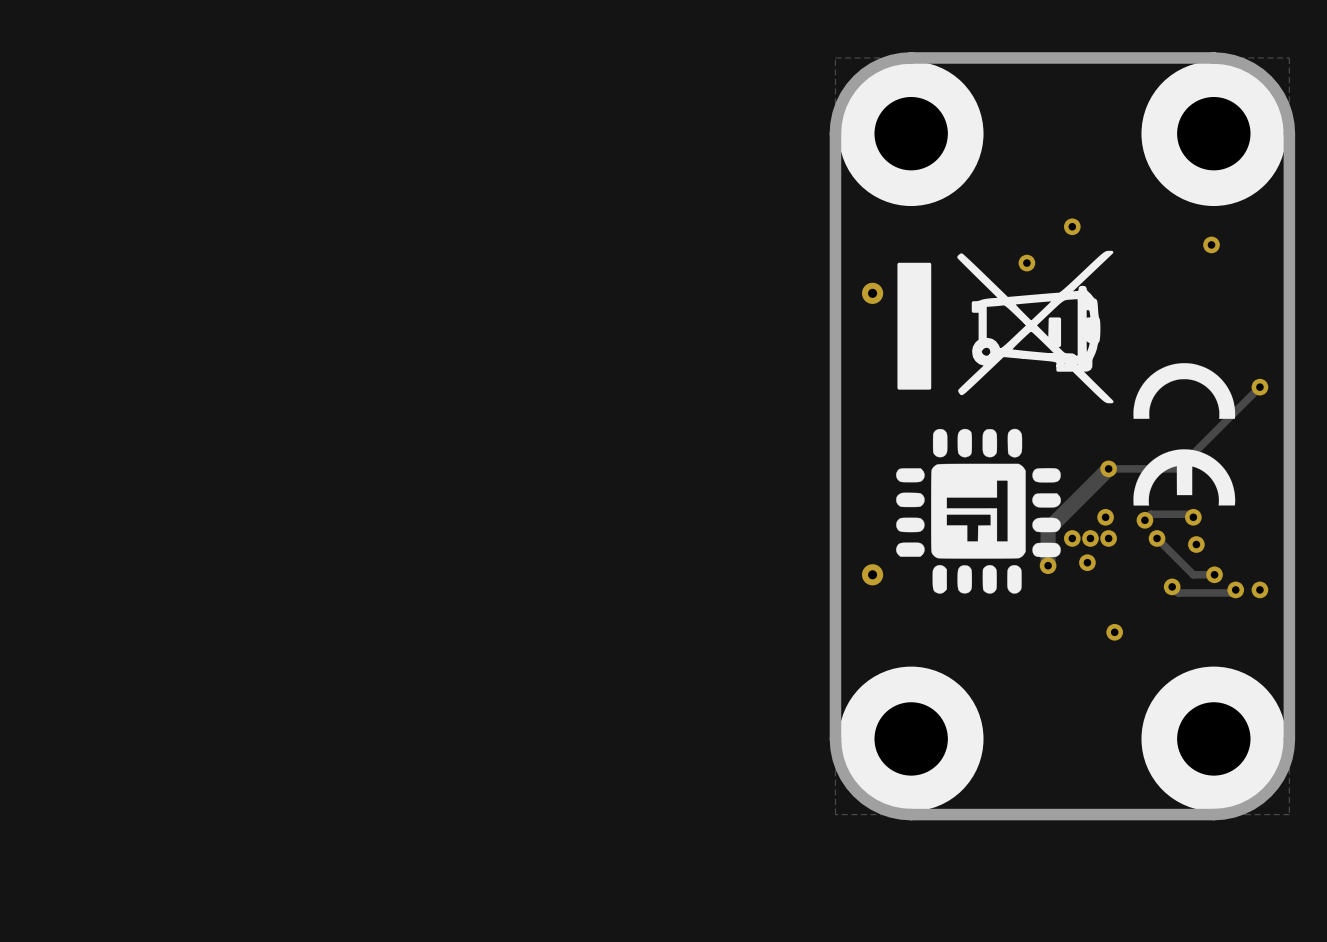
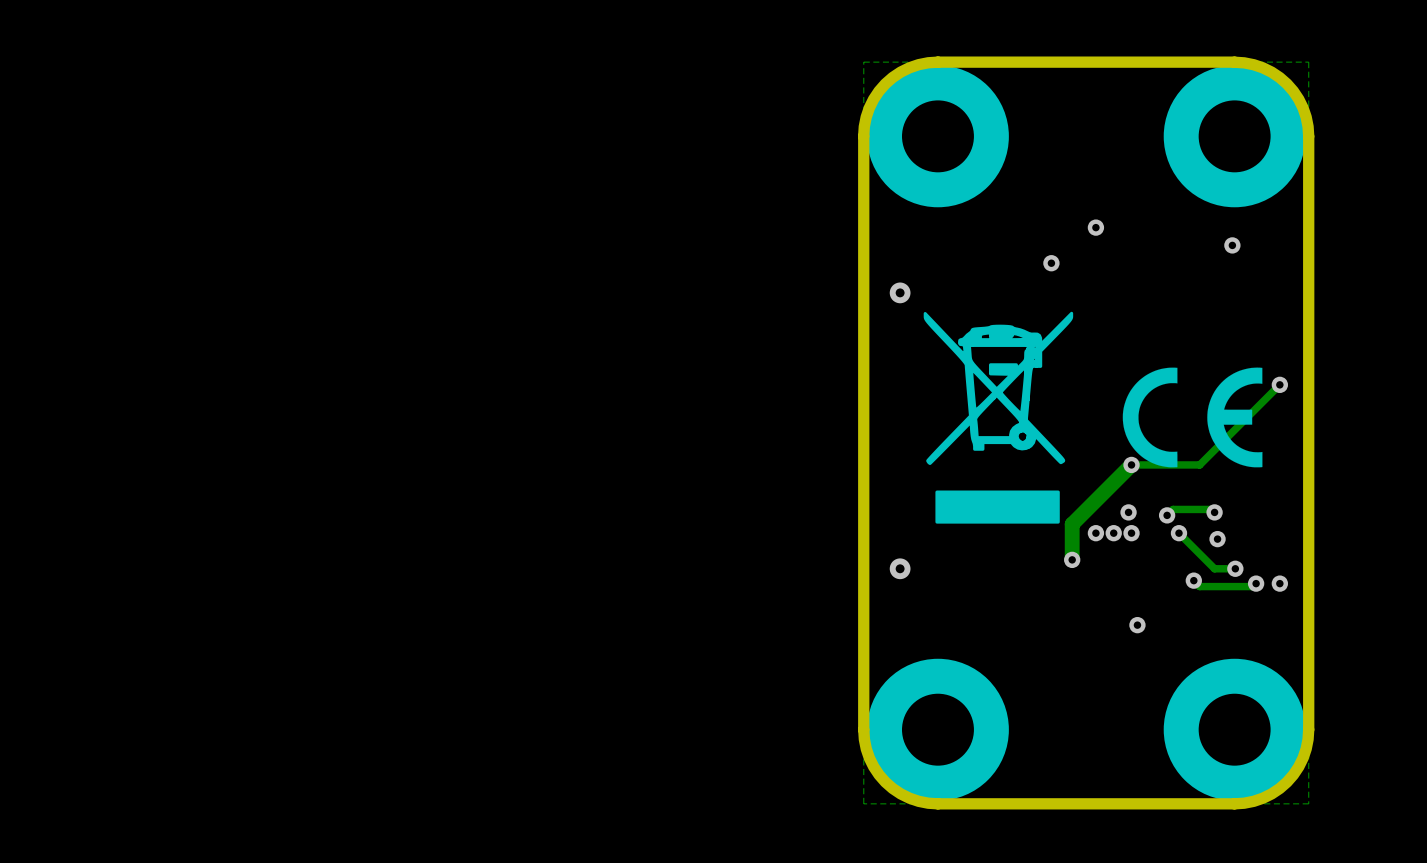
drawing: [896, 250, 1114, 594] -> none
drawing: none -> [923, 311, 1074, 524]
drawing shape: [1133, 363, 1236, 506] -> [1122, 367, 1263, 468]
via: (1087, 562) -> none

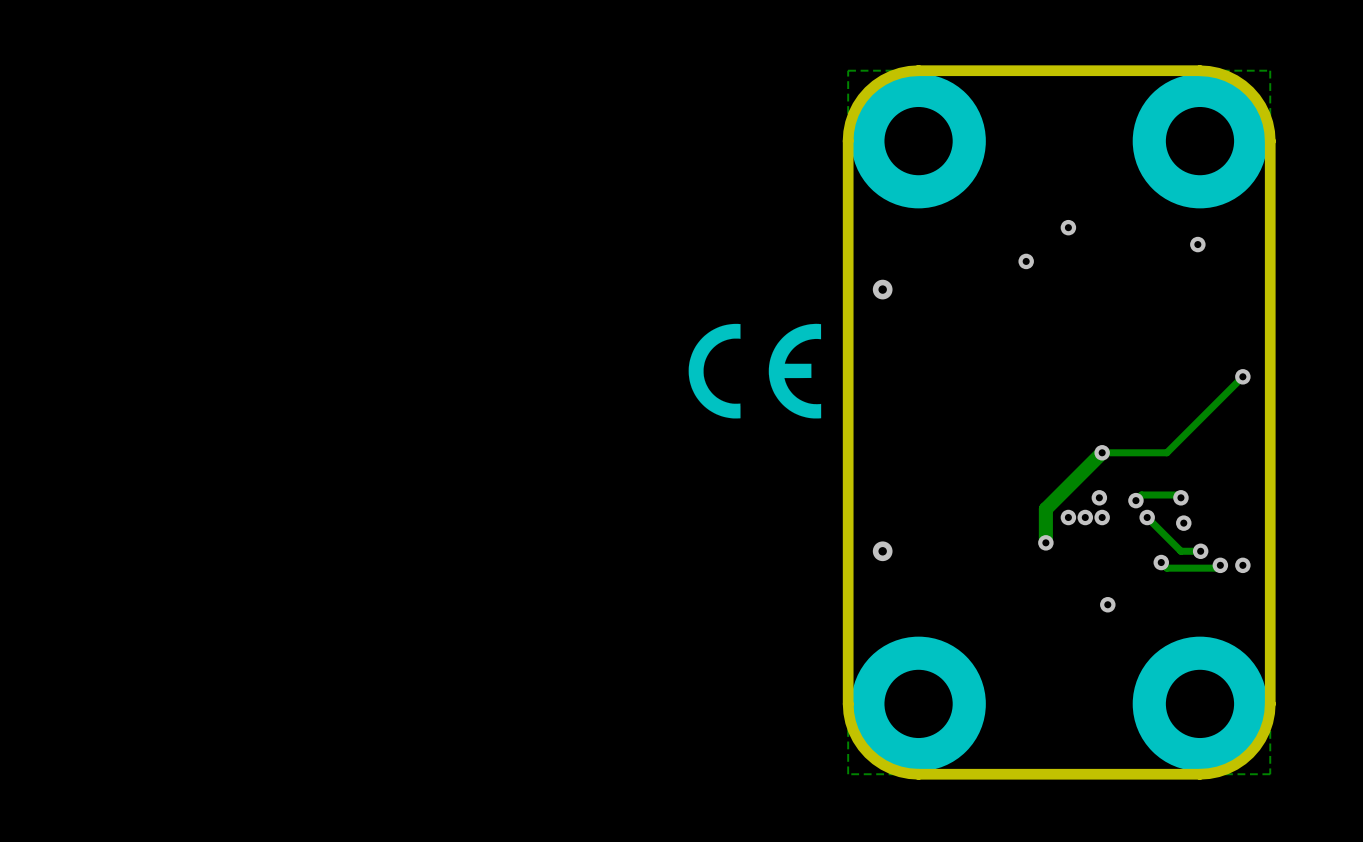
drawing: [923, 311, 1074, 524] -> none
drawing position: (1192, 417) -> (754, 371)

